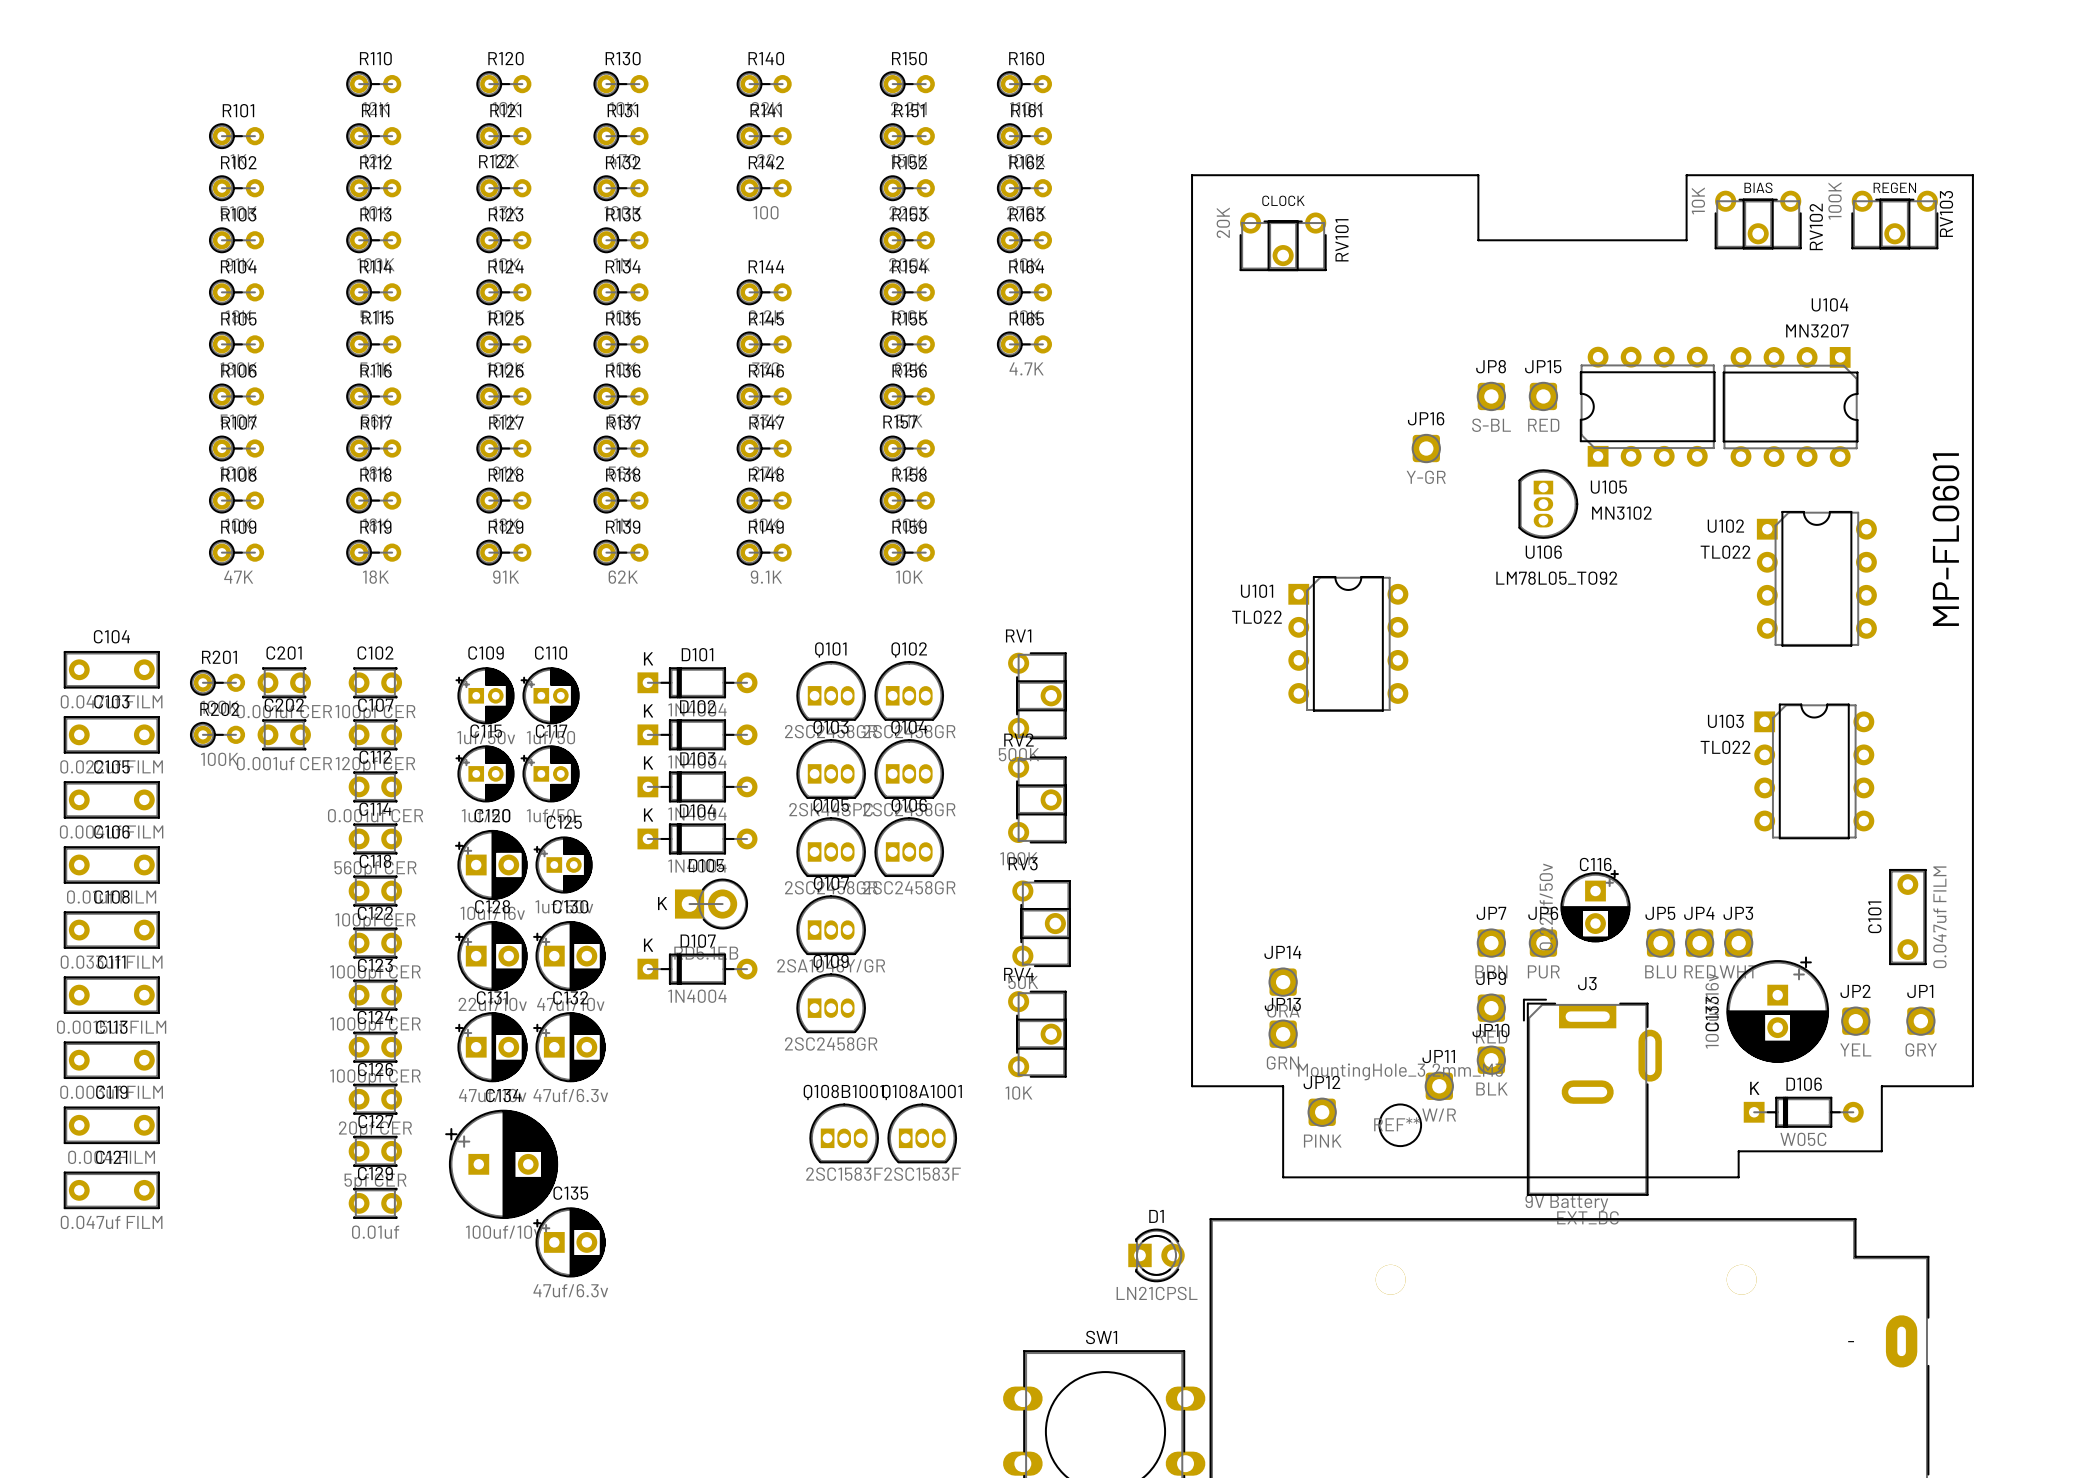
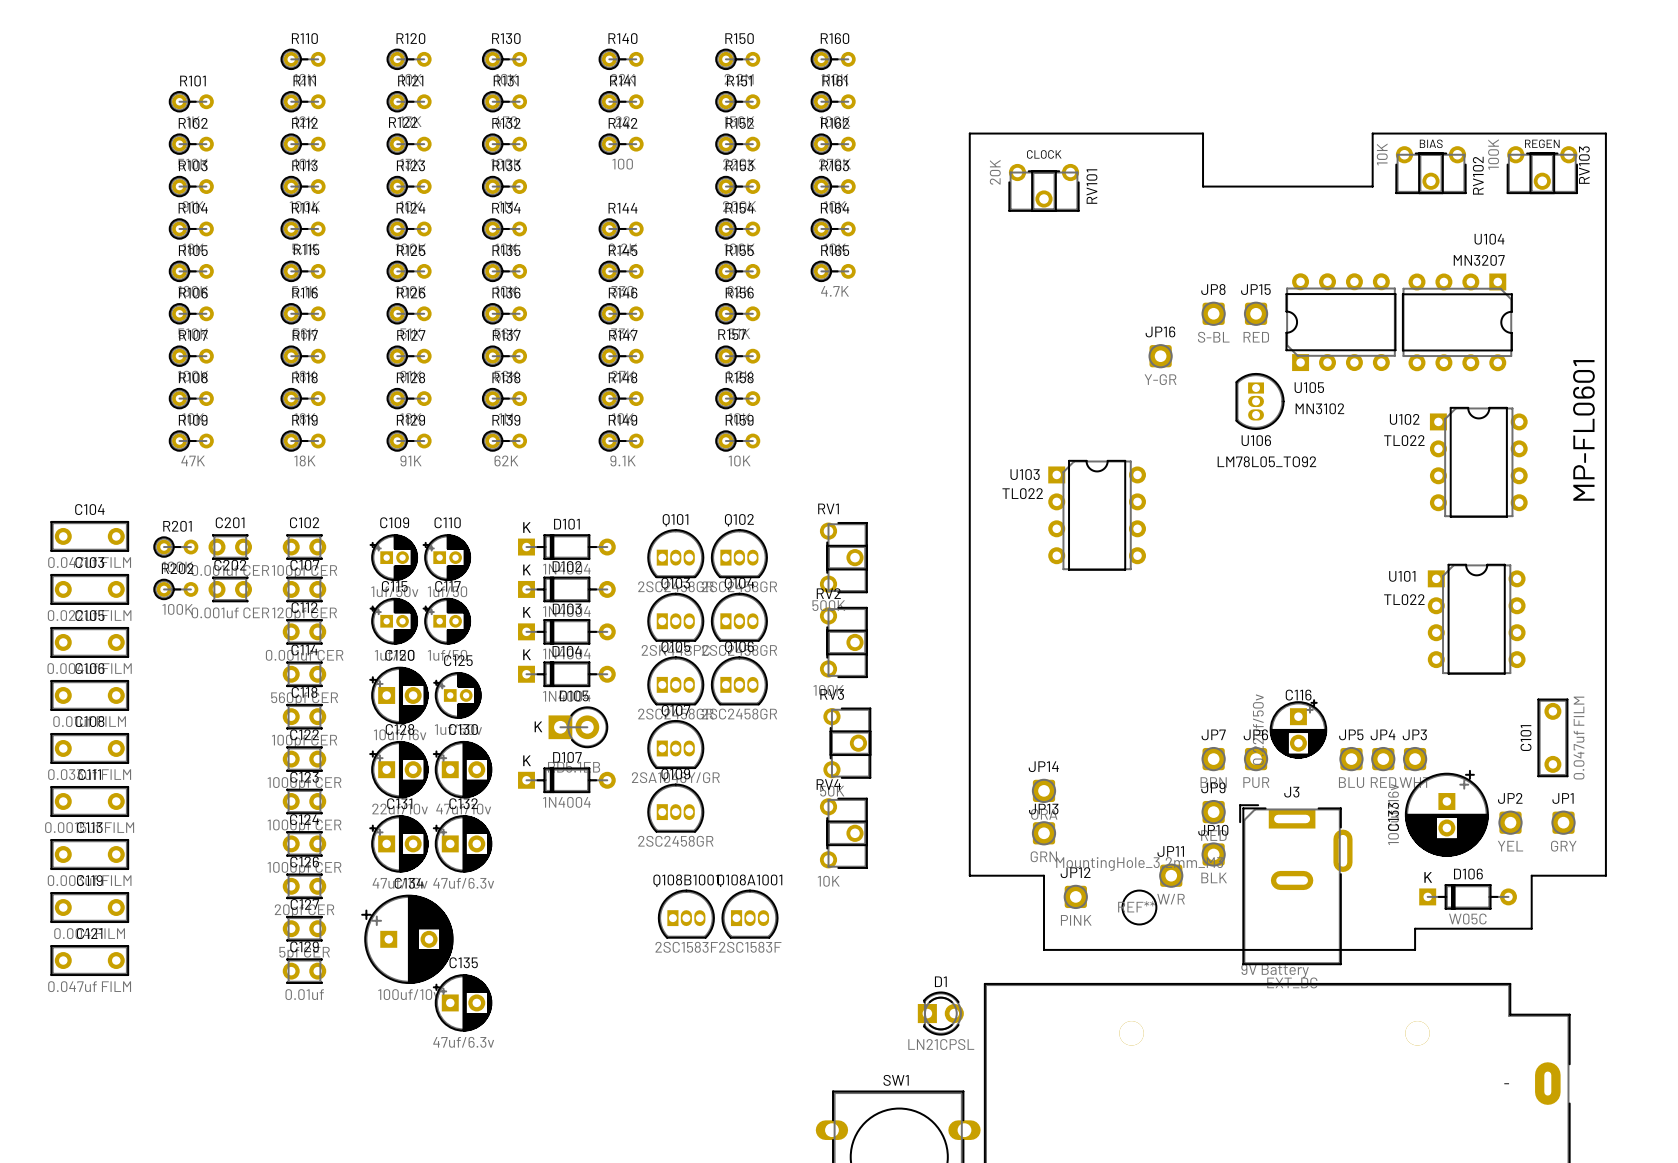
U101 name: U101 (1257, 591) -> U103 (1025, 474)
U103 name: U103 (1725, 721) -> U101 (1402, 576)

